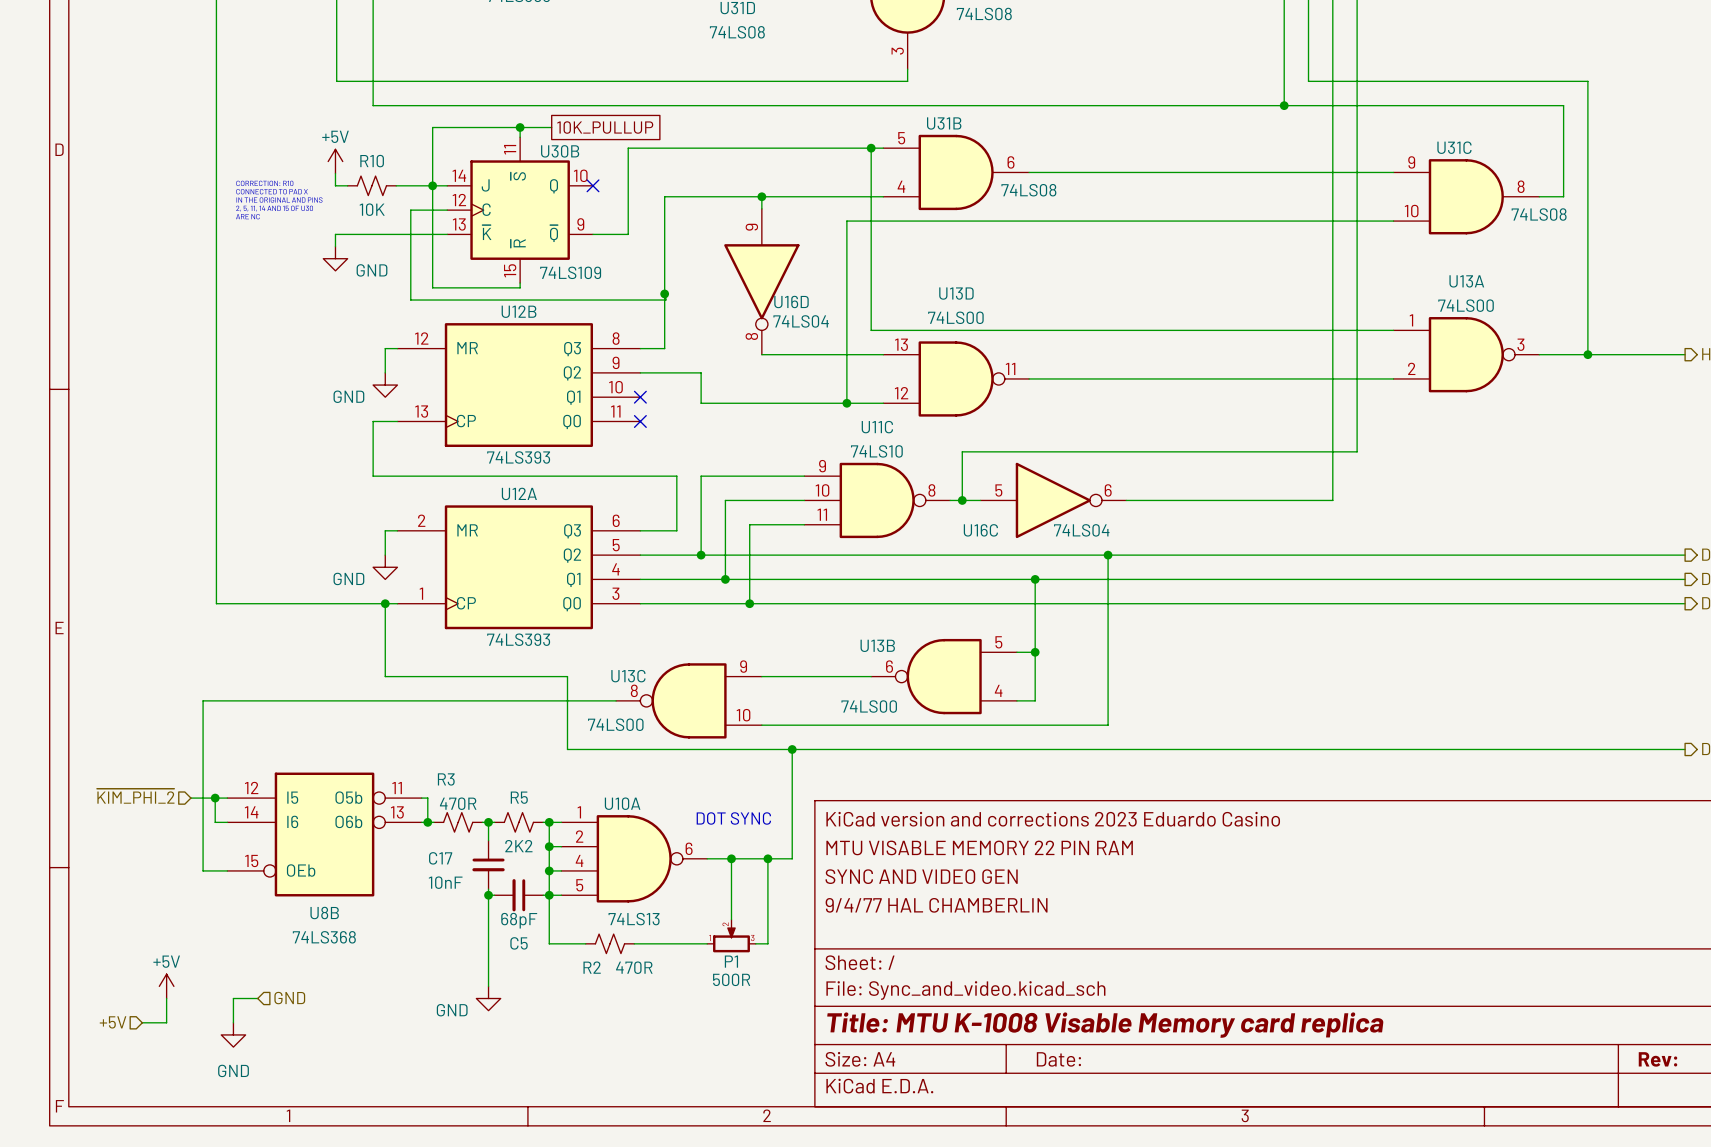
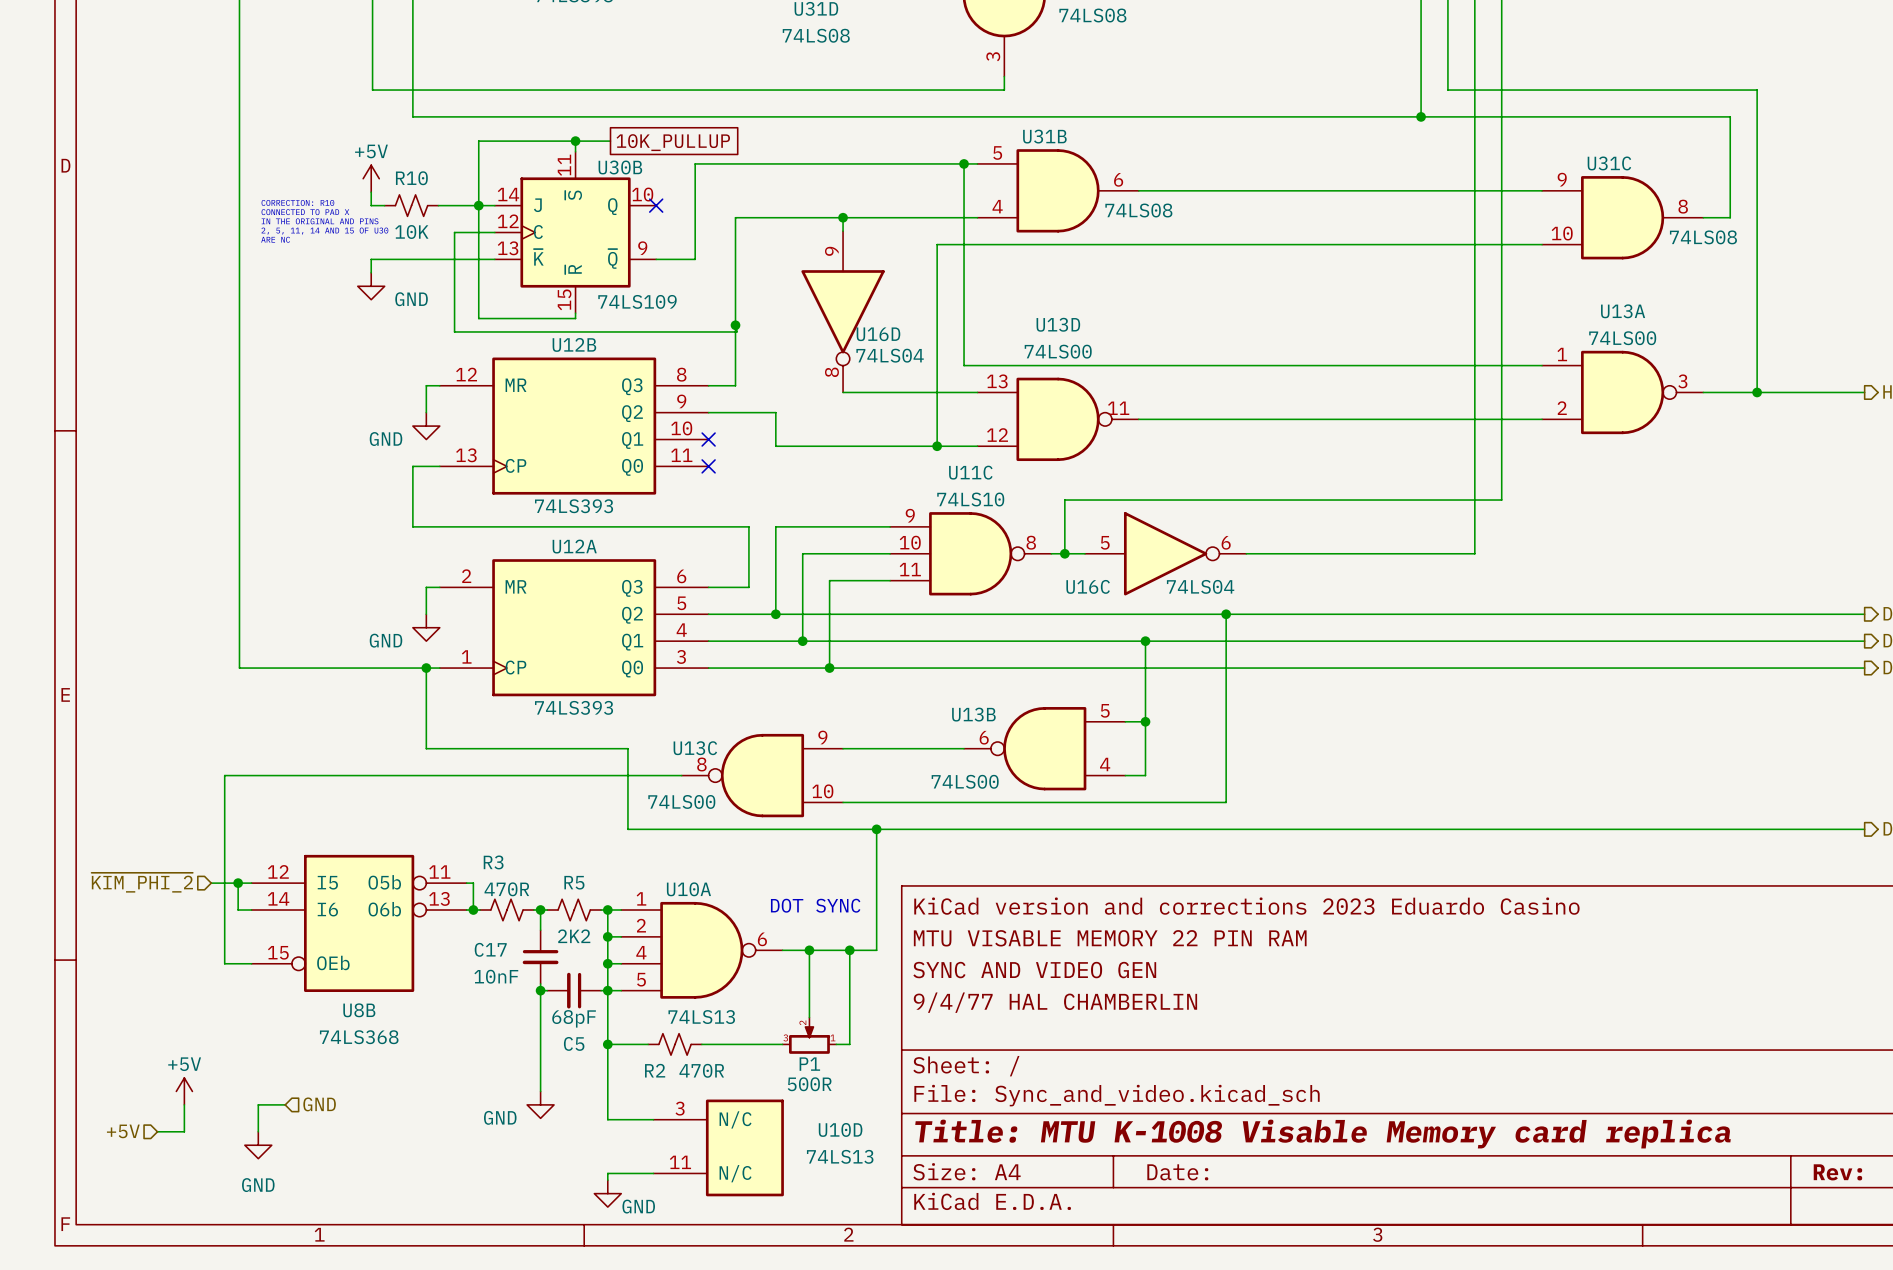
P1 flip: as is (731, 940) -> left-right (809, 1040)
wire: none -> (607, 1044) (607, 1119) (653, 1119)
junction: none -> (607, 1044)
U10D: none -> 74LS13 (718, 1147)
wire: none -> (653, 1173) (607, 1173) (607, 1180)
power symbol: none -> GND (607, 1193)

